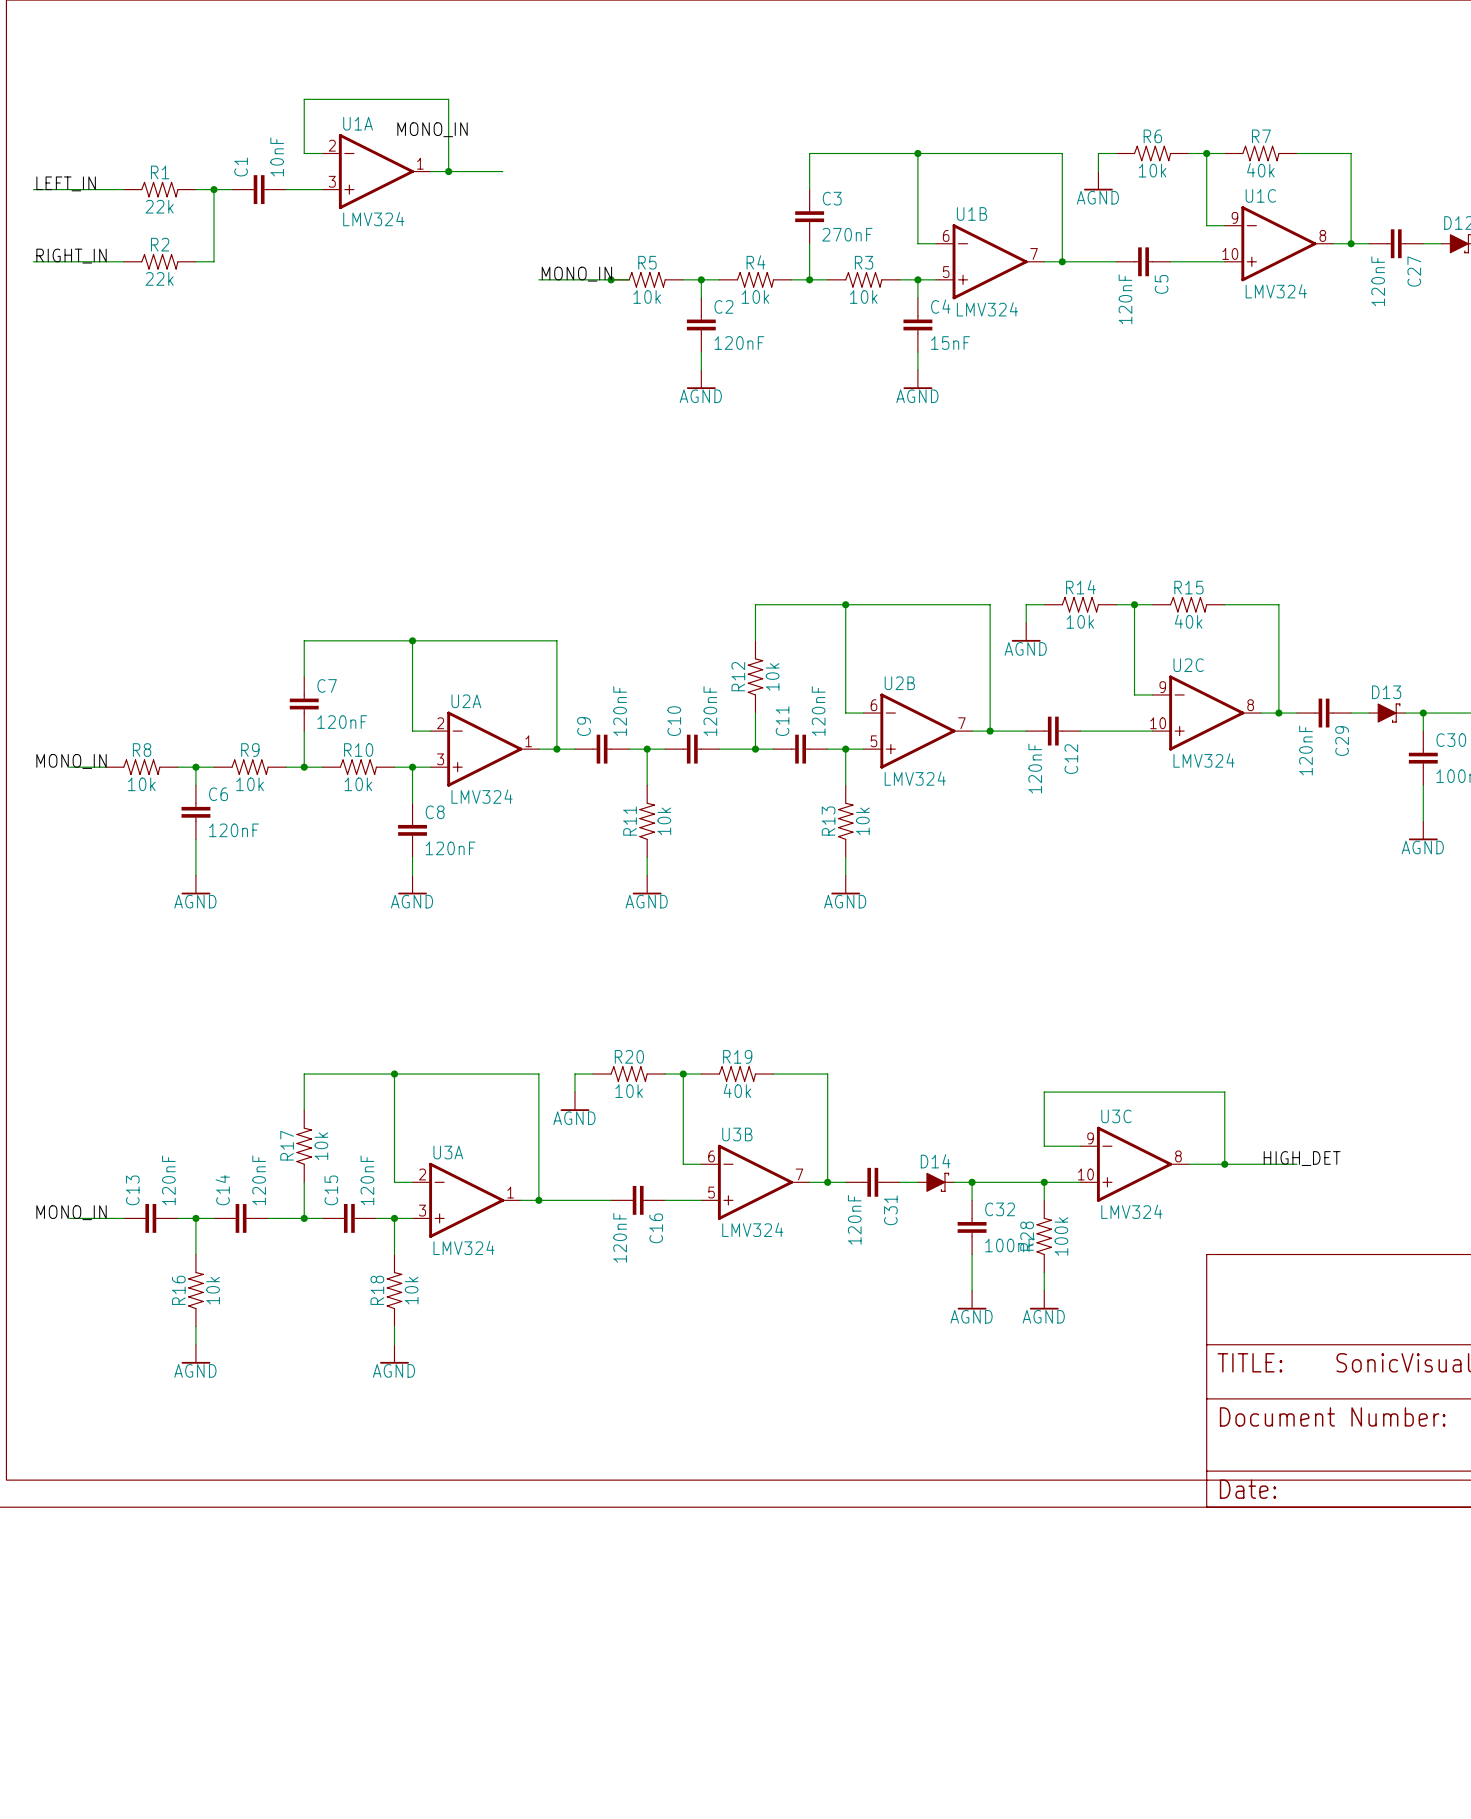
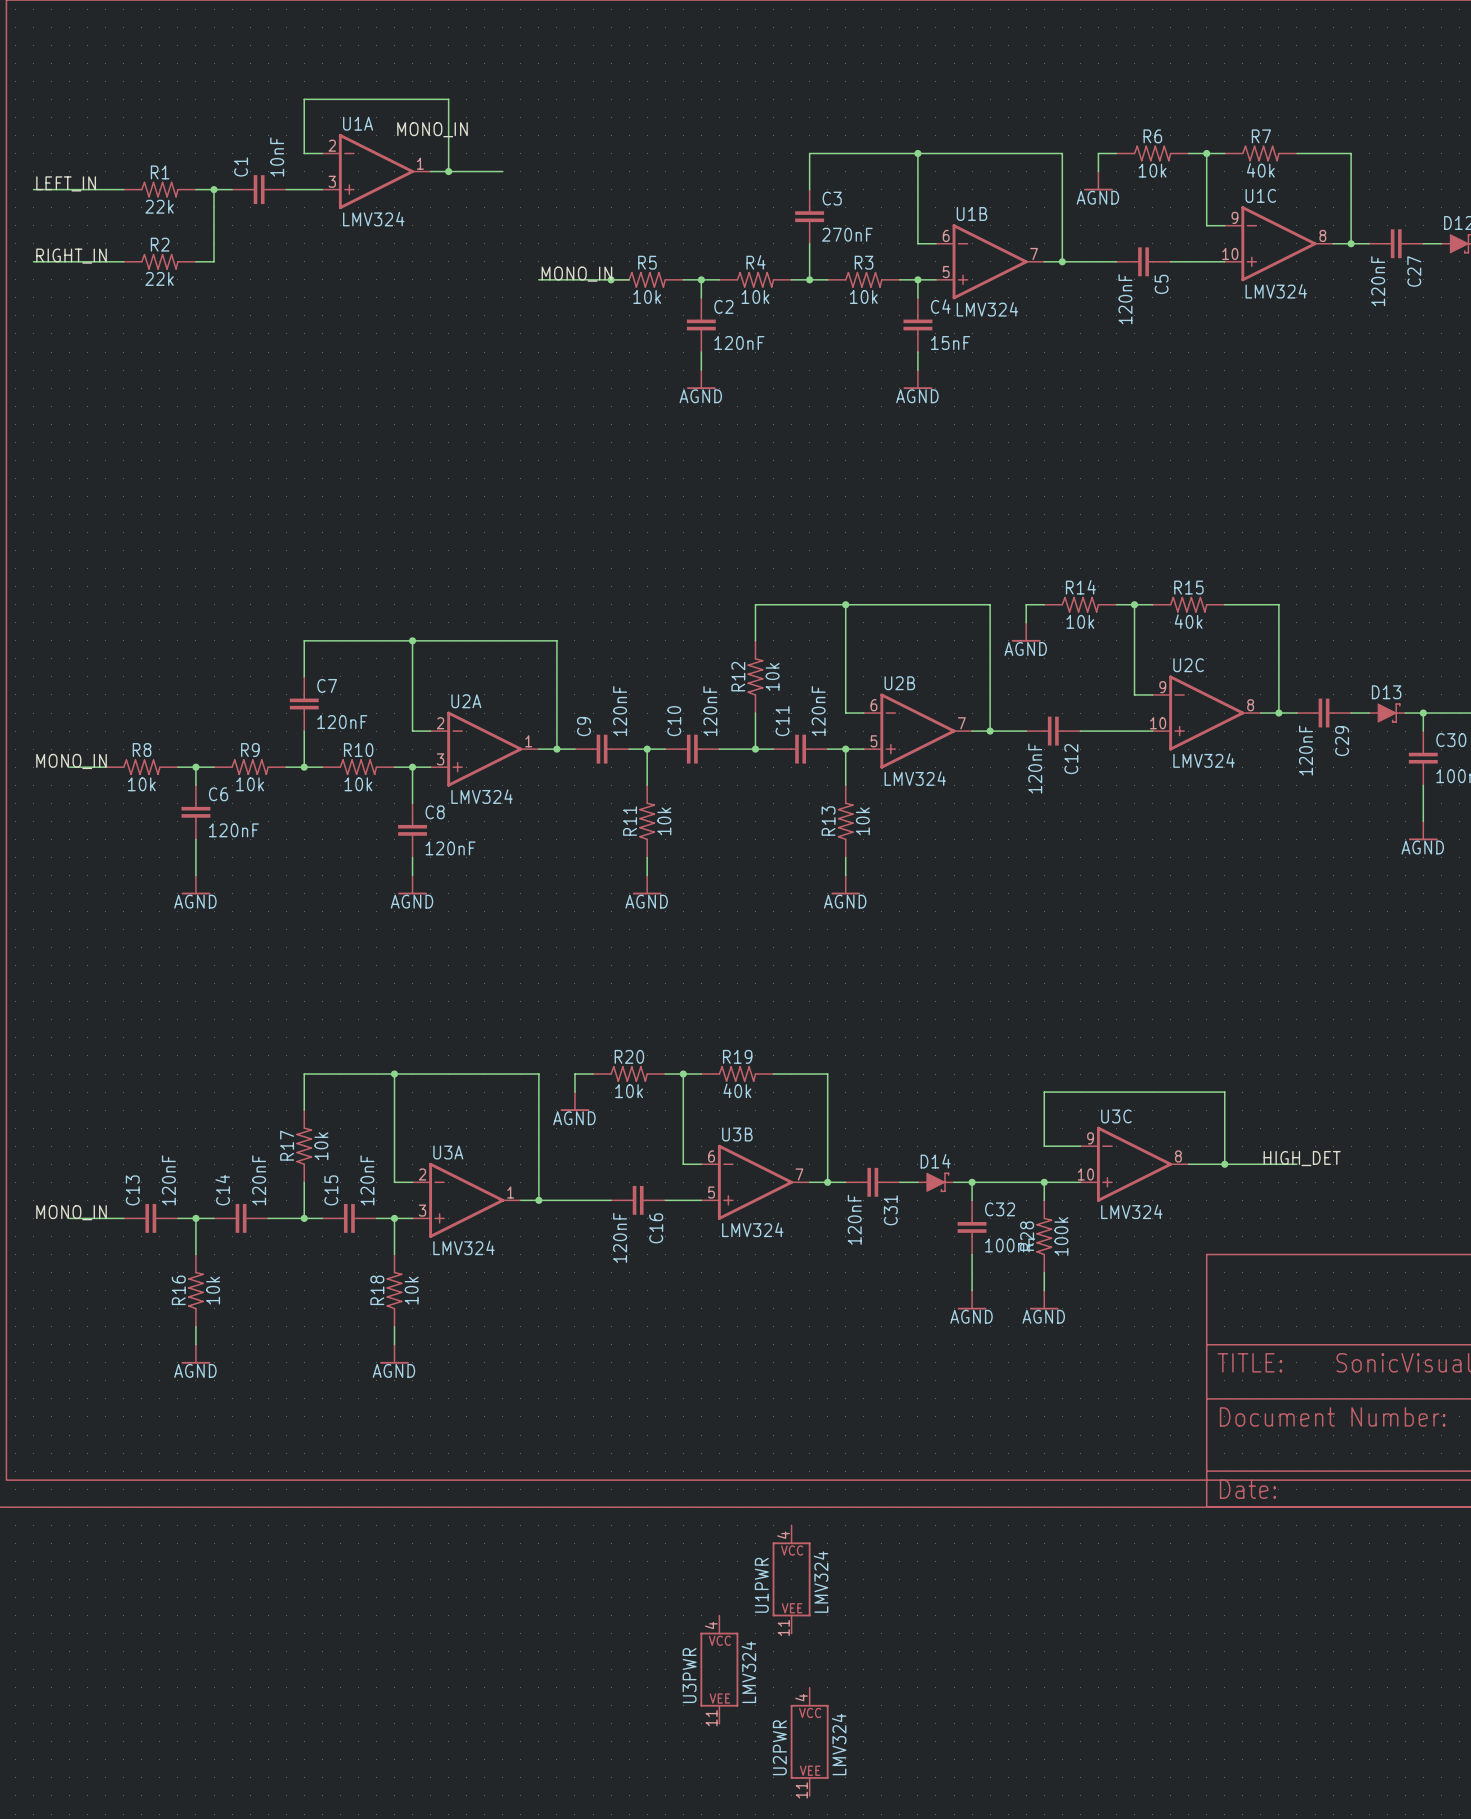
U1PWR: none -> LMV324 (791, 1579)
U3PWR: none -> LMV324 (719, 1669)
U2PWR: none -> LMV324 (809, 1741)

